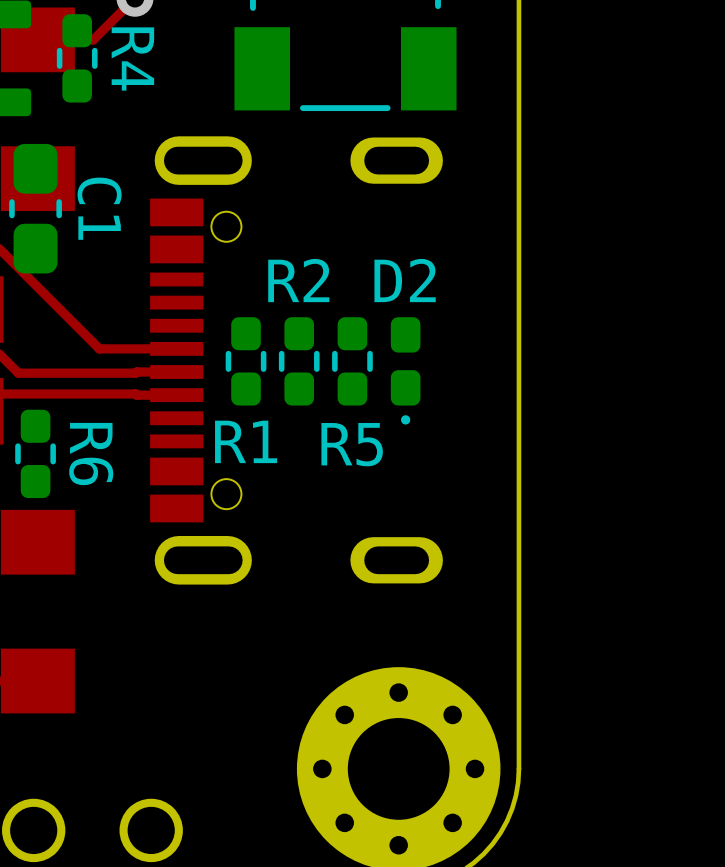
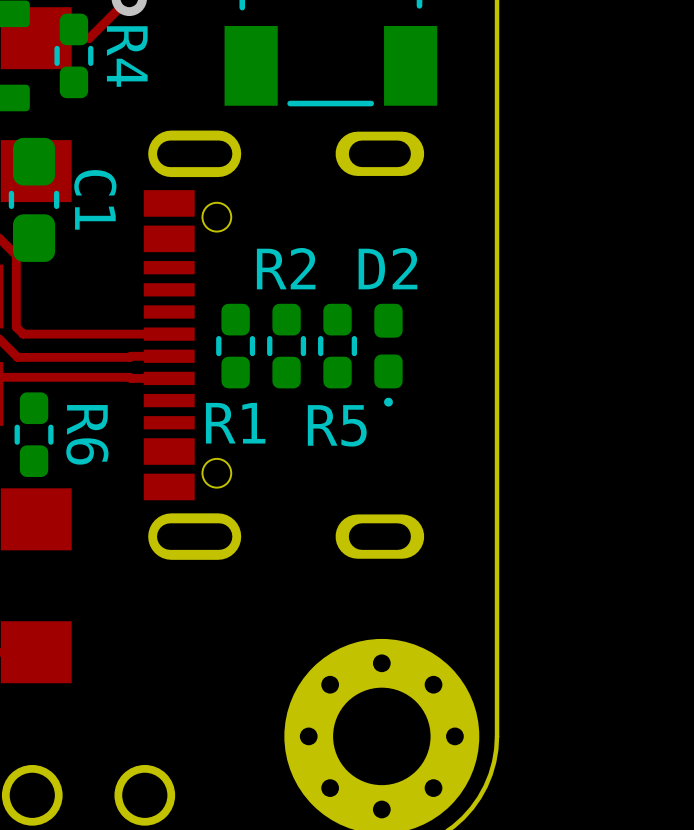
top track: (17, 266) (99, 348) -> (16, 255) (16, 327) (23, 334) (95, 334)

